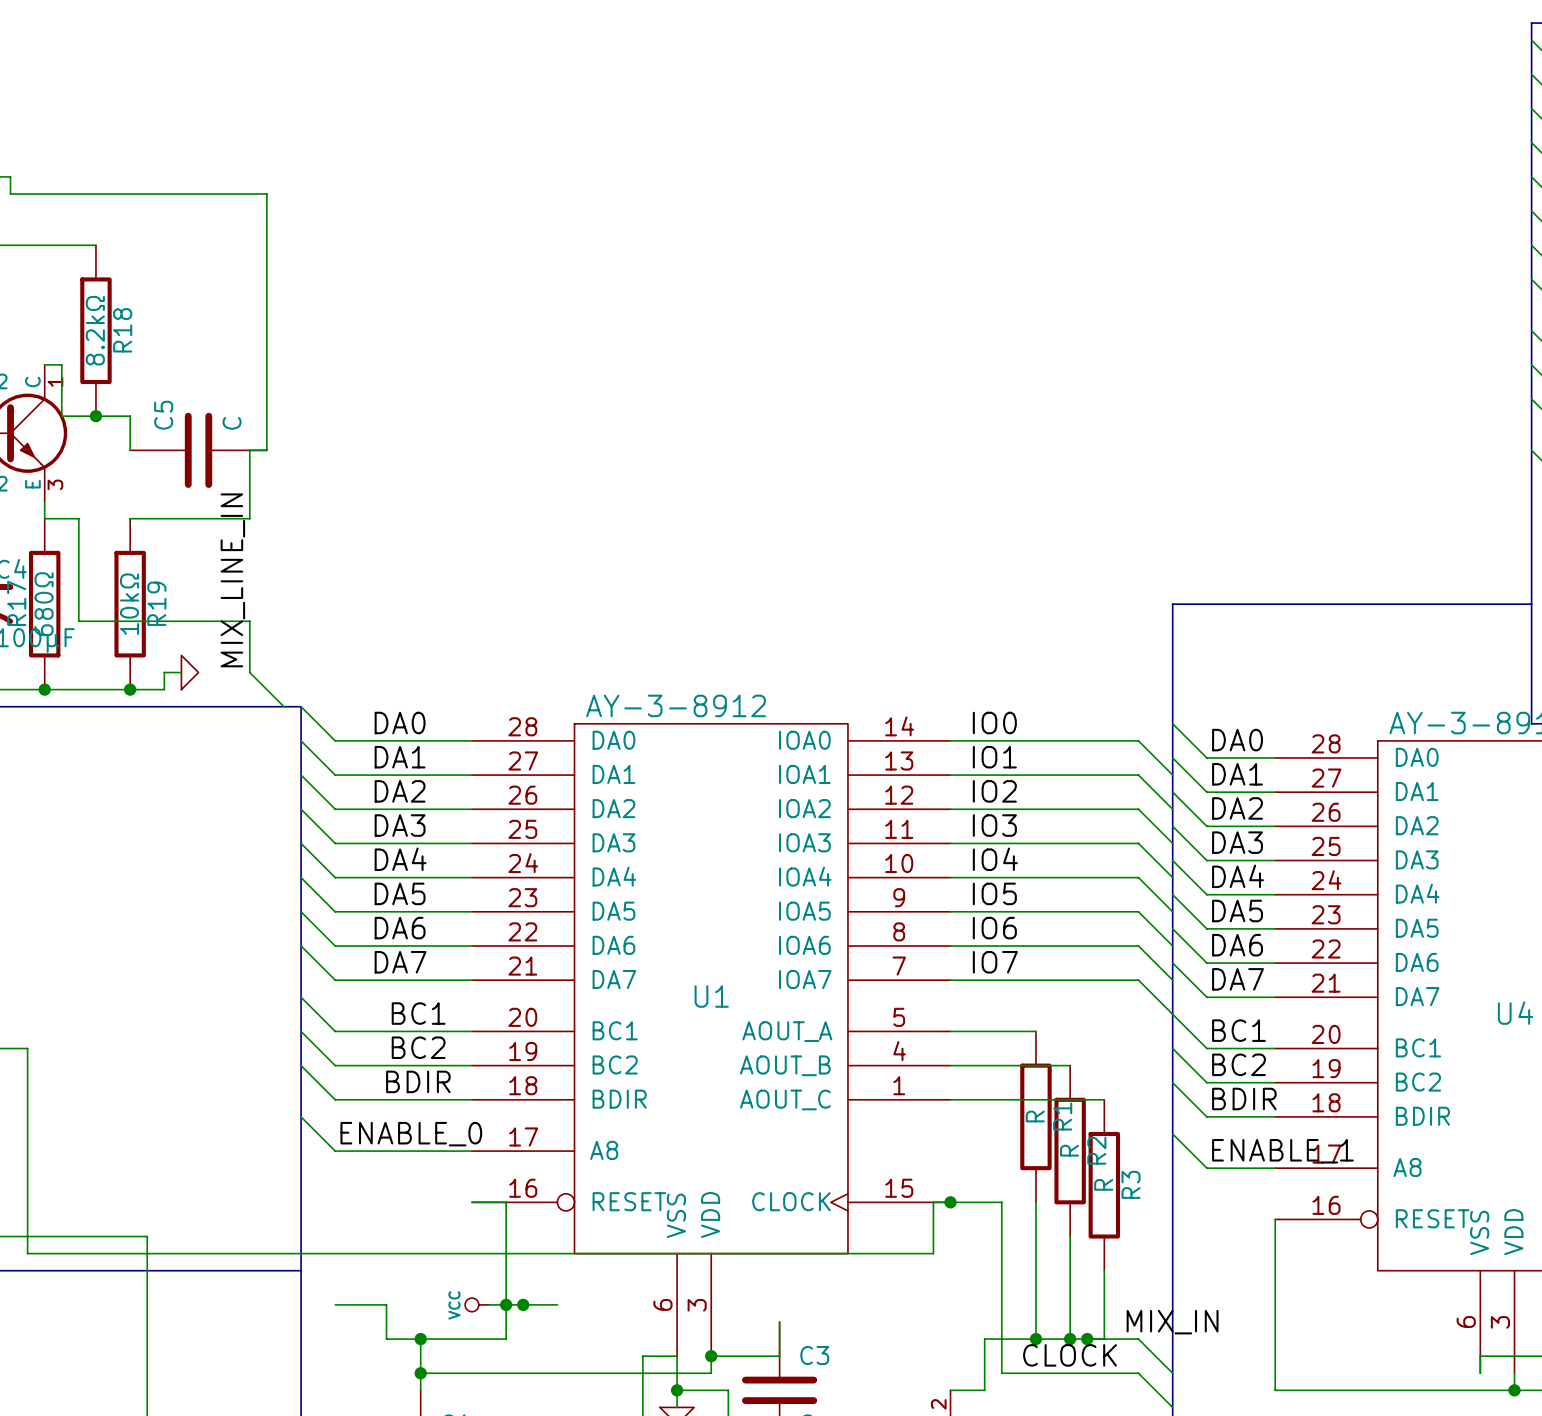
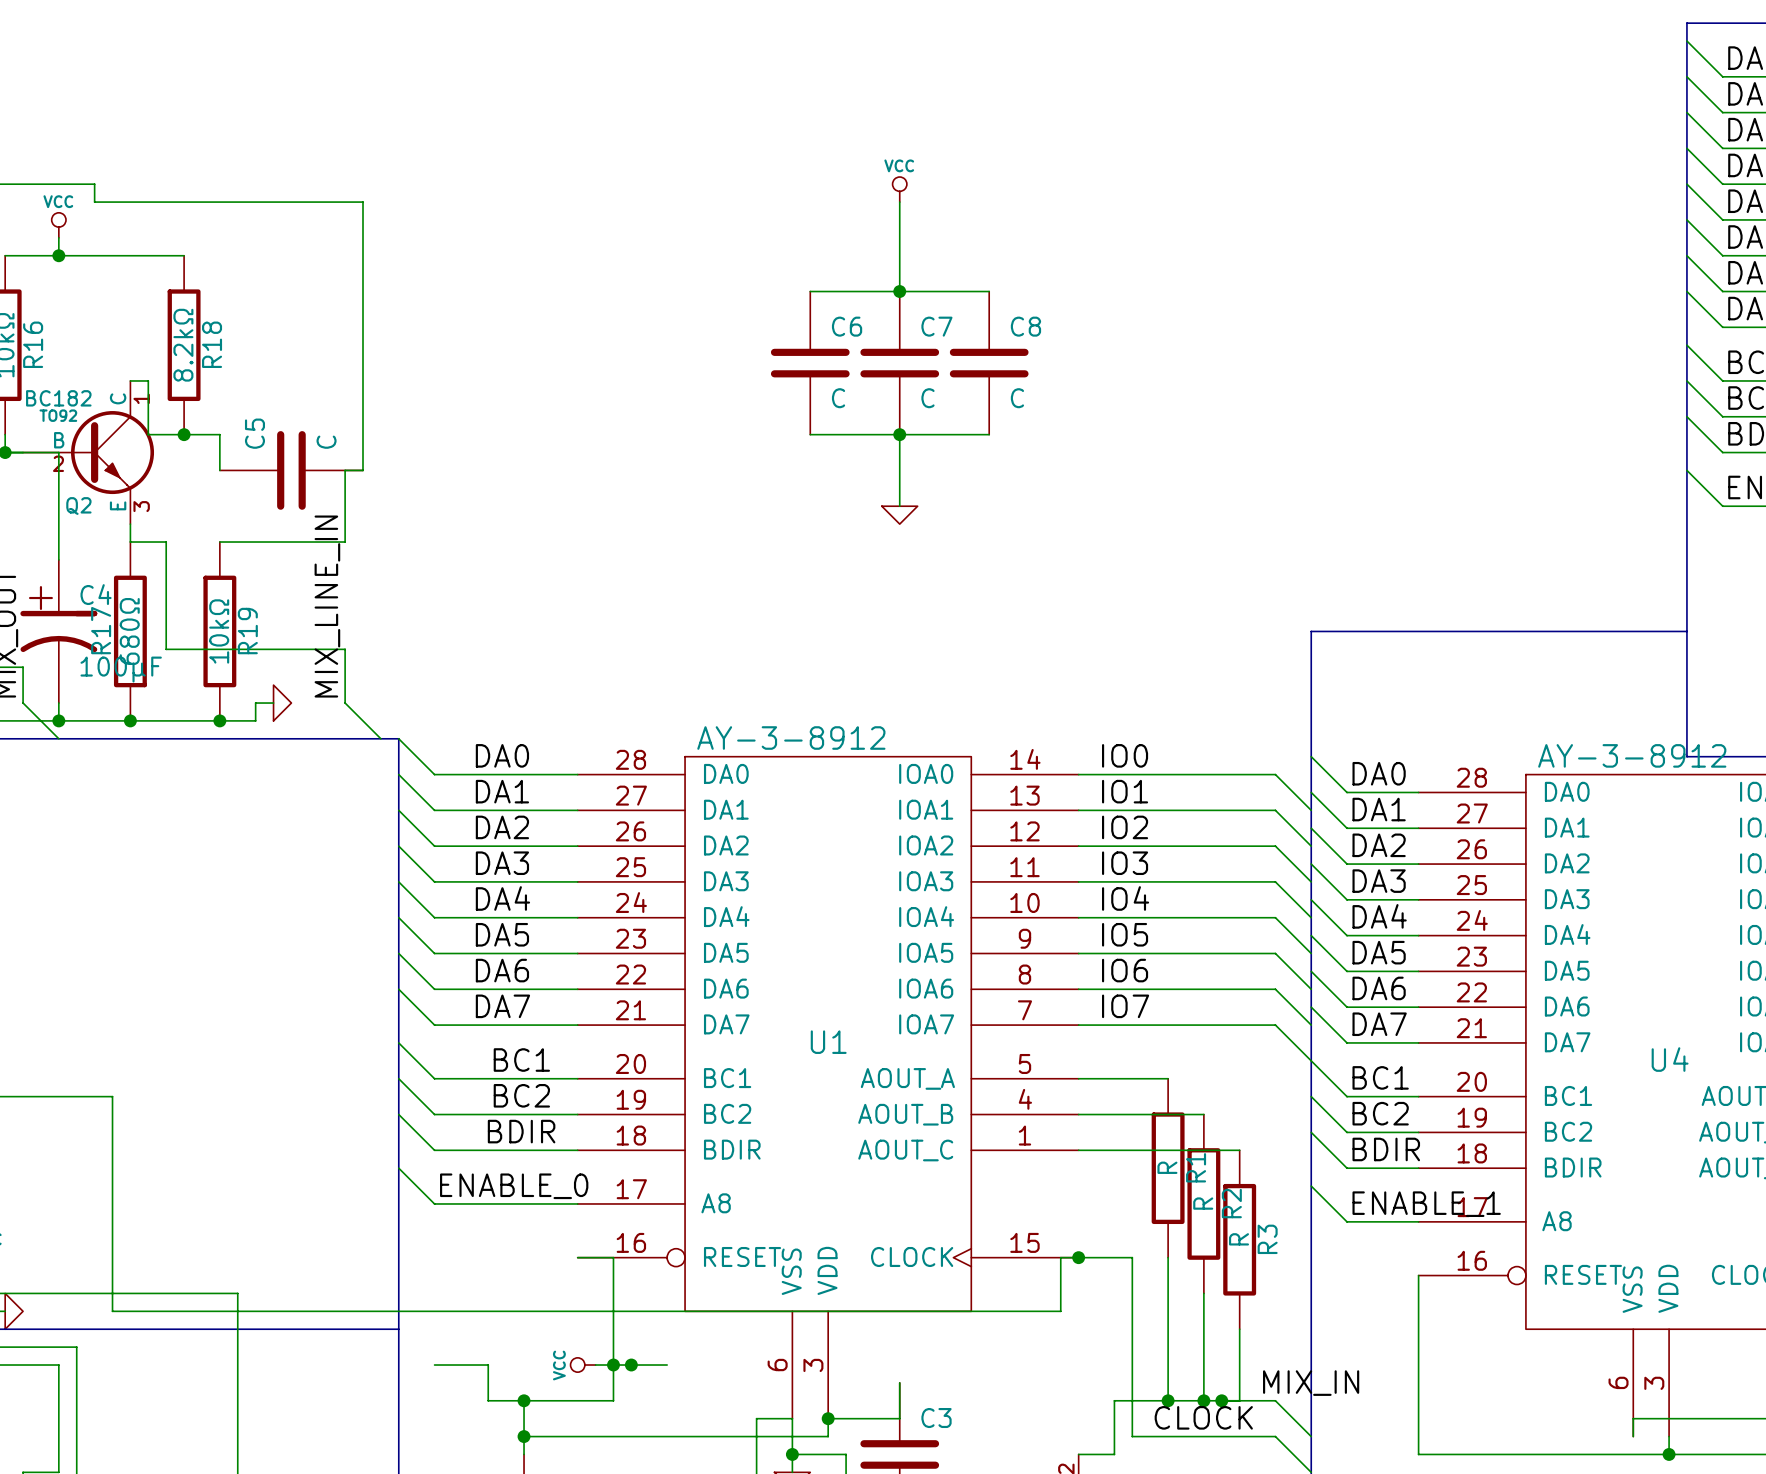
power symbol: none -> VCC (899, 189)
wire: none -> (899, 202) (899, 291)
wire: none -> (810, 291) (989, 291)
junction: none -> (899, 291)
C6: none -> C (810, 363)
C7: none -> C (899, 363)
C8: none -> C (989, 363)
wire: none -> (810, 434) (989, 434)
wire: none -> (899, 434) (899, 506)
junction: none -> (899, 434)
power symbol: none -> (899, 515)

